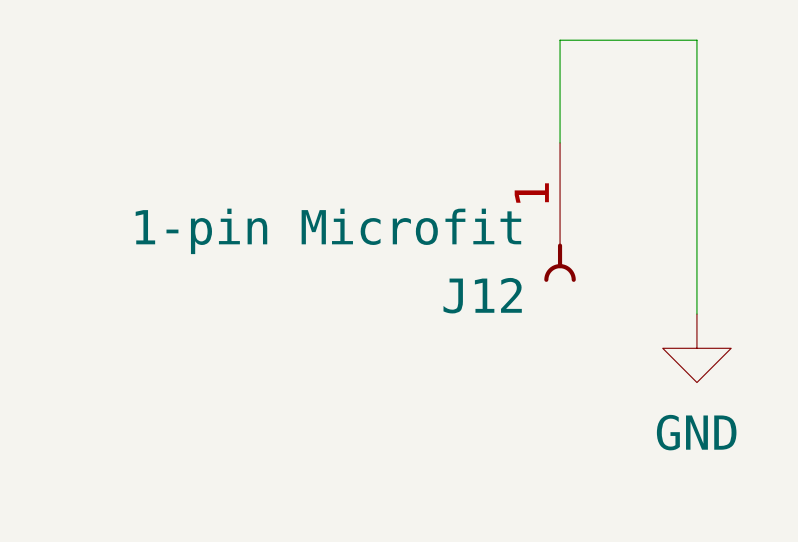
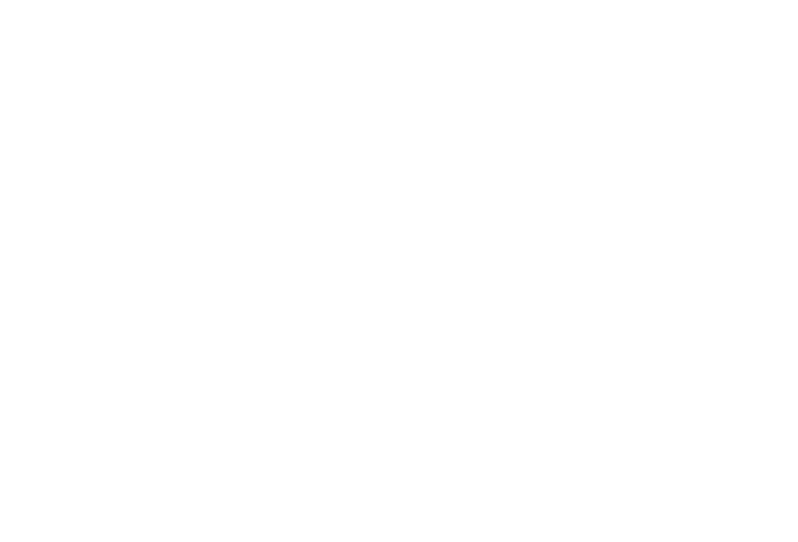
wire: (560, 142) (560, 40) (696, 40) (696, 314) -> none
J12: 1-pin Microfit (560, 212) -> none
power symbol: GND (696, 348) -> none

